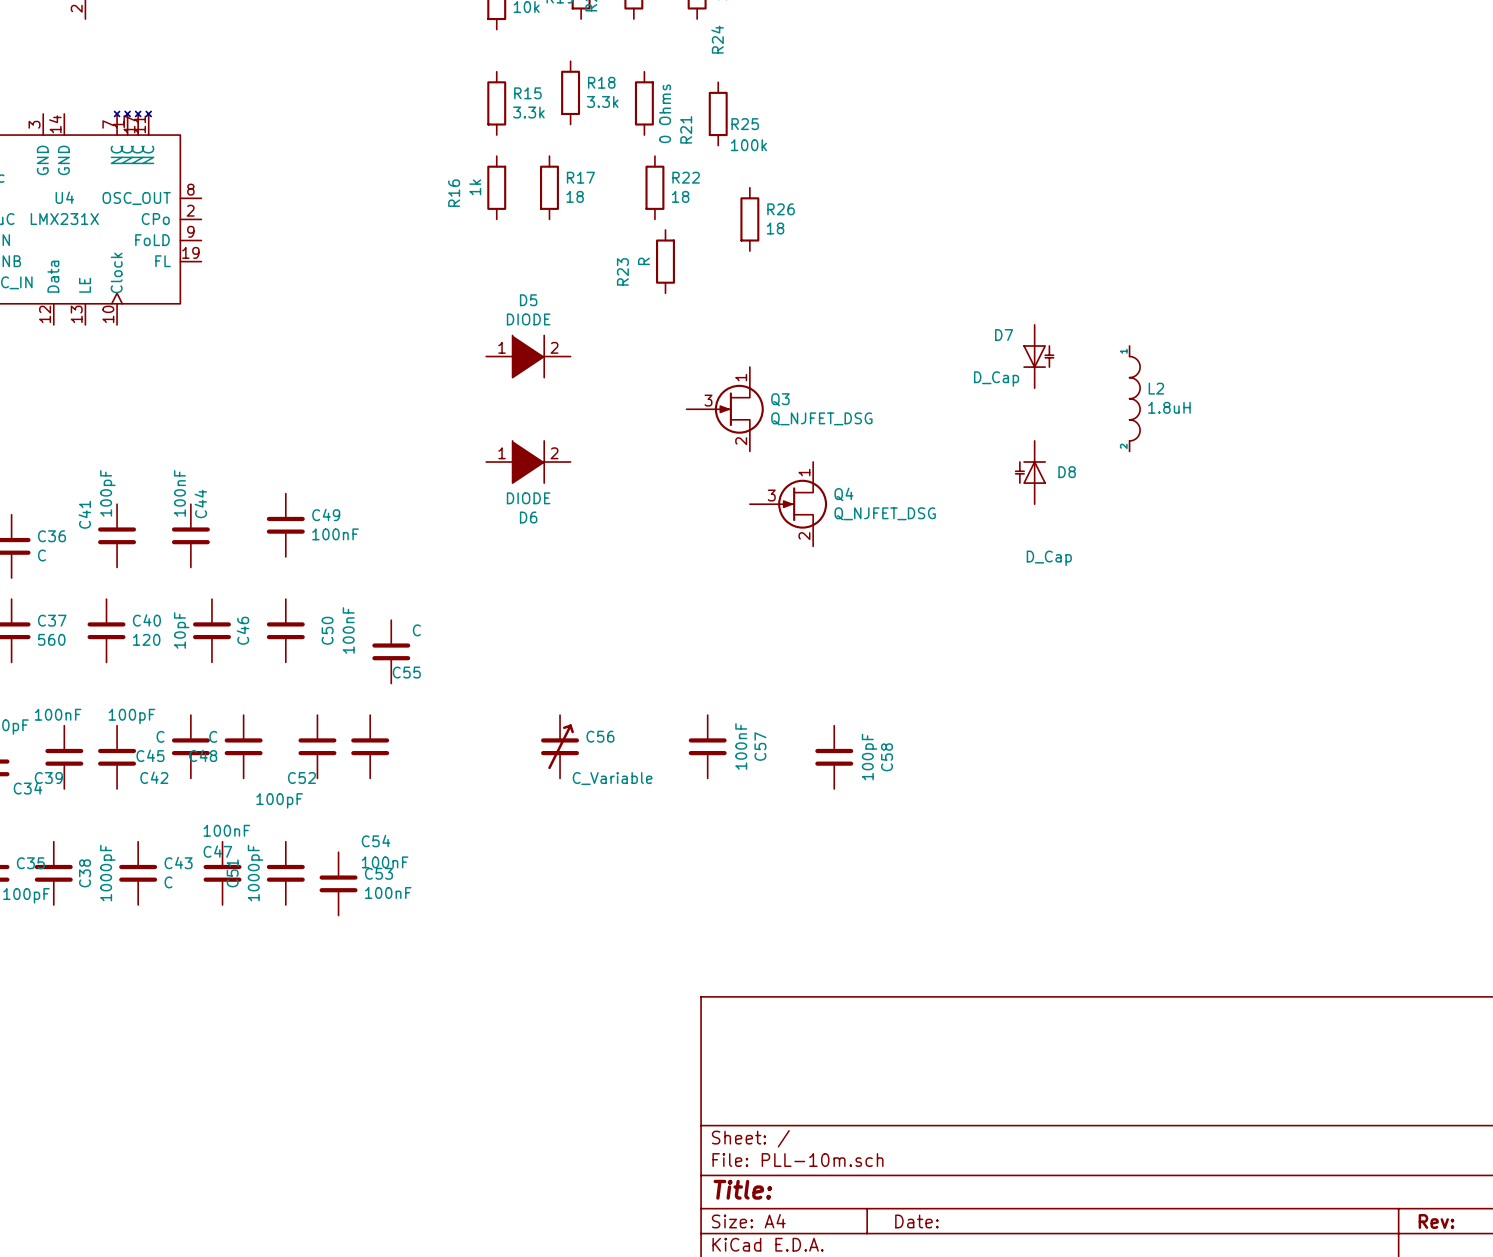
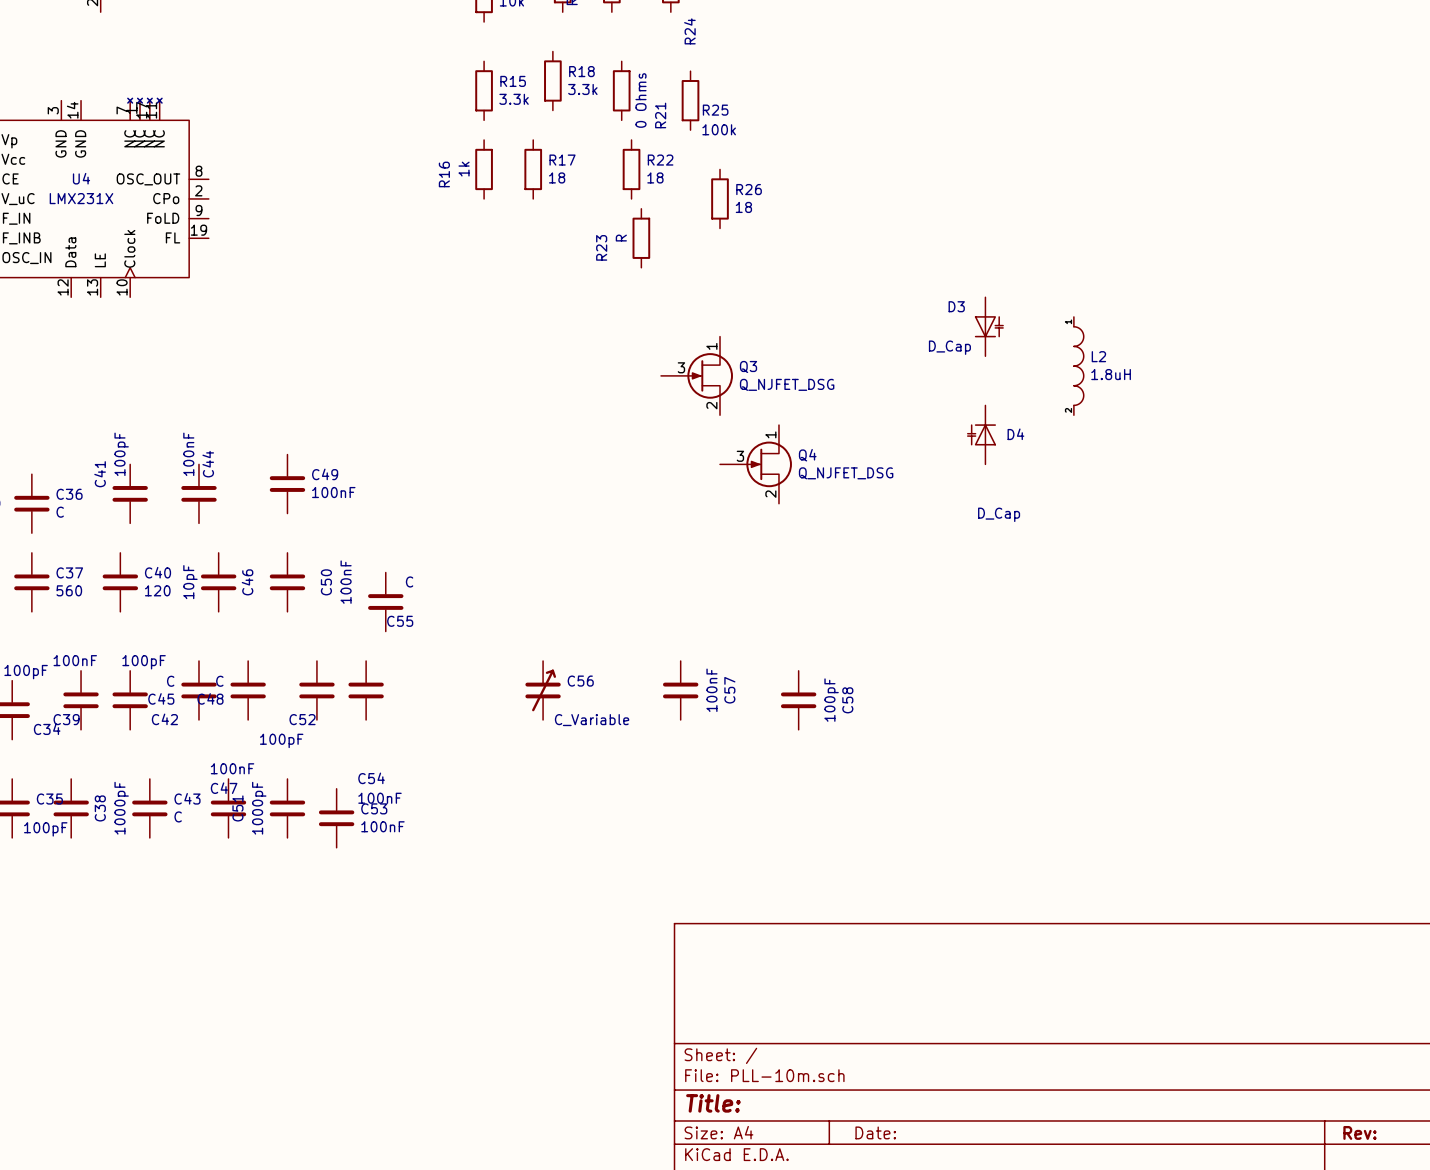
D7 name: D7 (1004, 335) -> D3 (956, 306)
D5: DIODE (528, 356) -> none
D6: DIODE (528, 462) -> none
D8 name: D8 (1067, 472) -> D4 (1015, 434)

